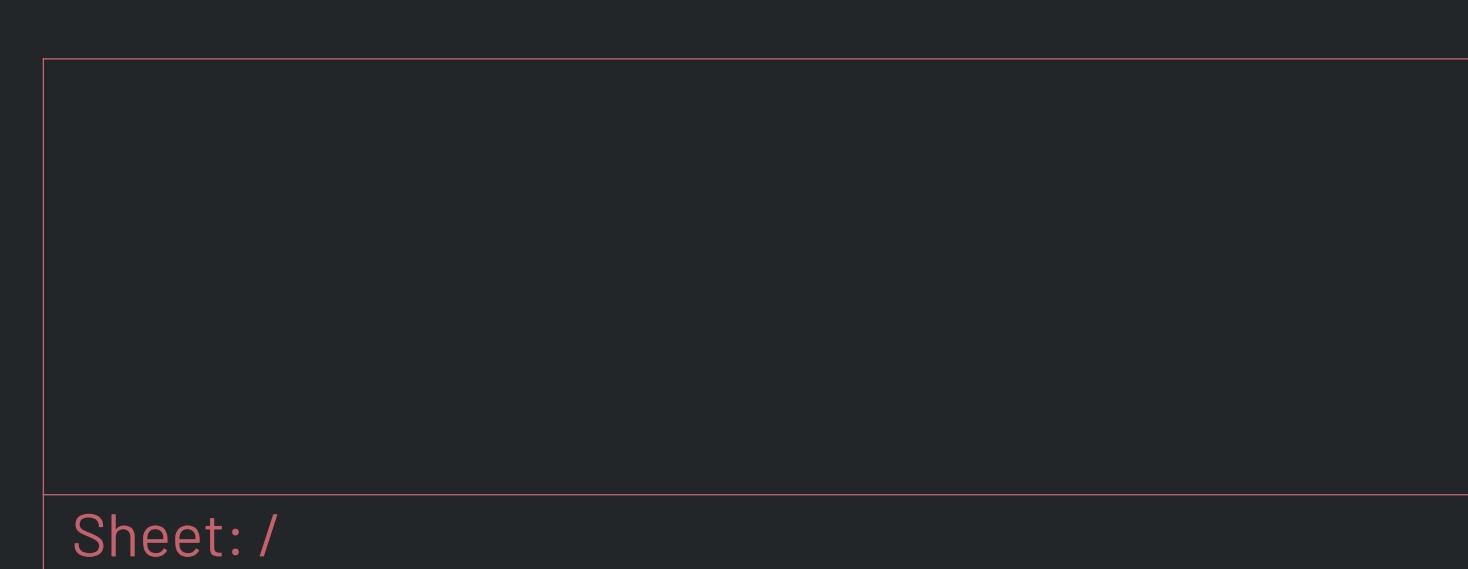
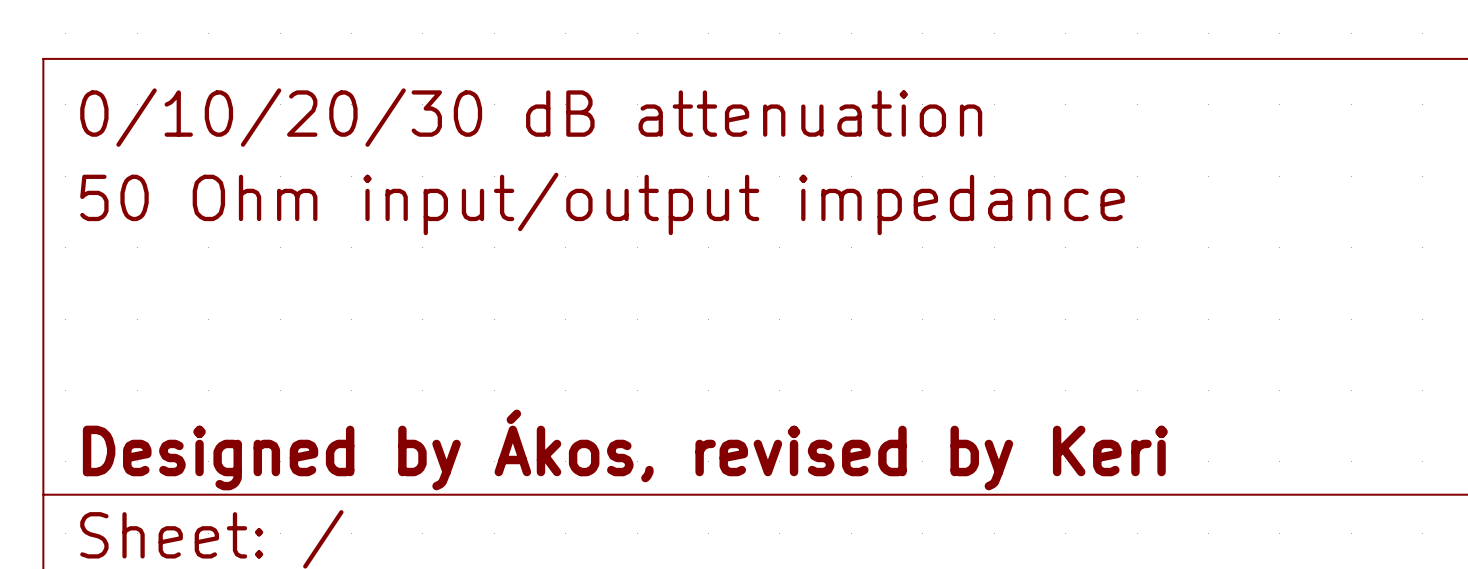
title block: none -> 0/10/20/30 dB attenuation (531, 117)
title block: none -> 50 Ohm input/output impedance (602, 203)
title block: none -> Designed by Ákos, revised by Keri (625, 449)

